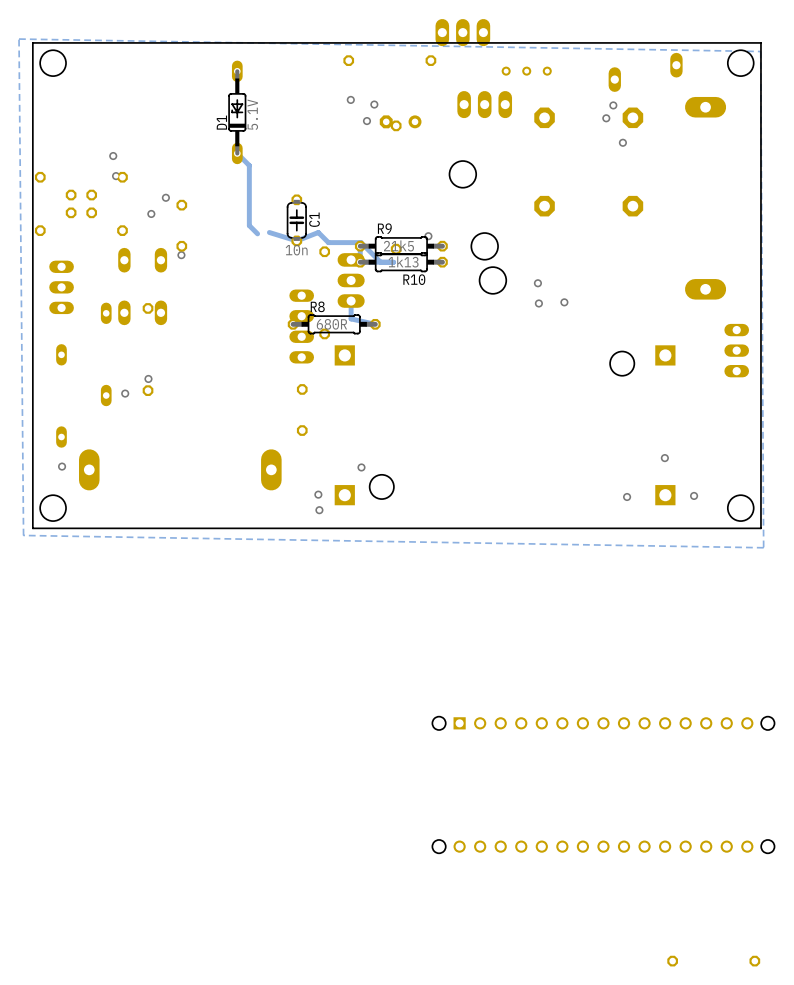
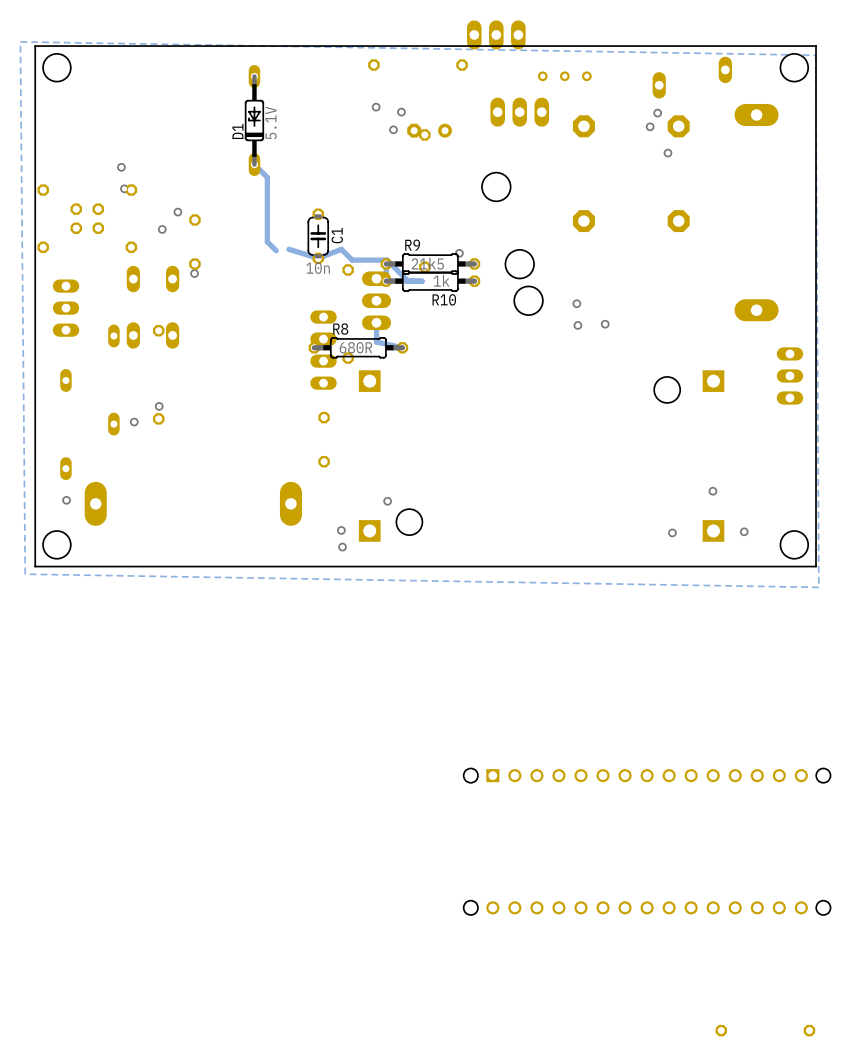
R10 value: 1k13 (403, 261) -> 1k (441, 280)

